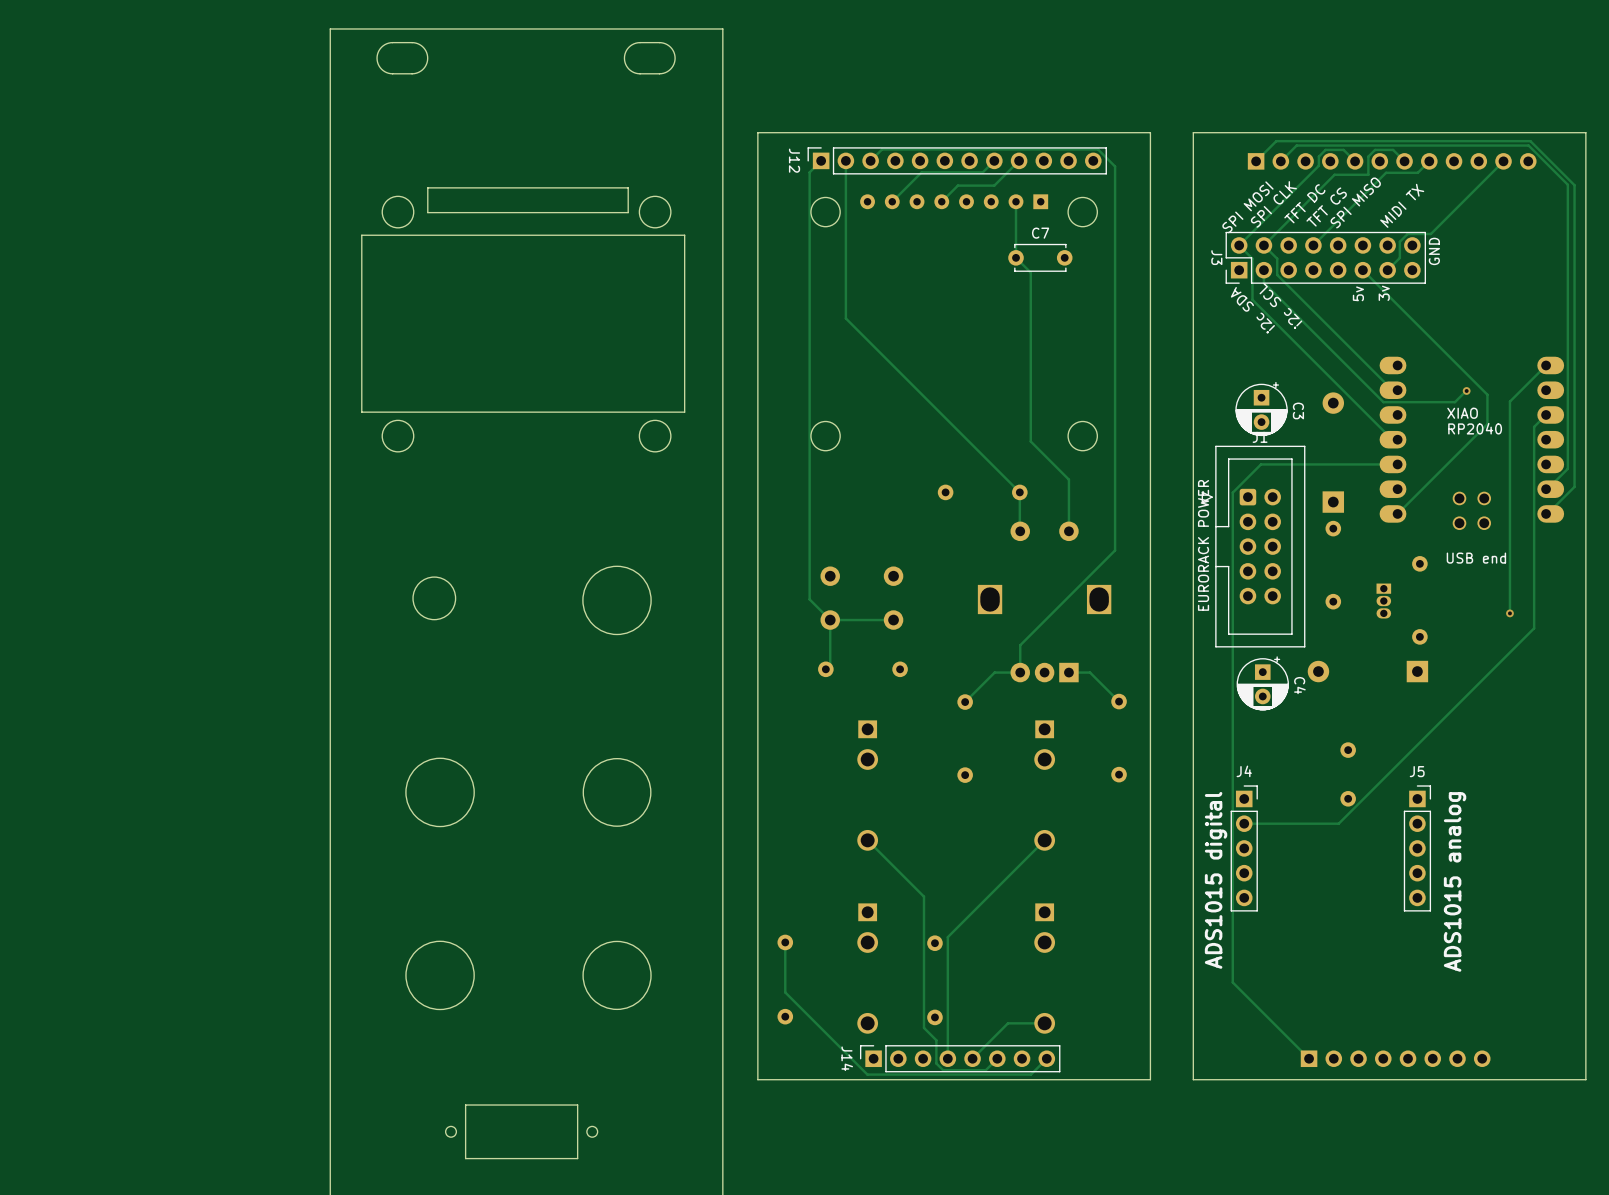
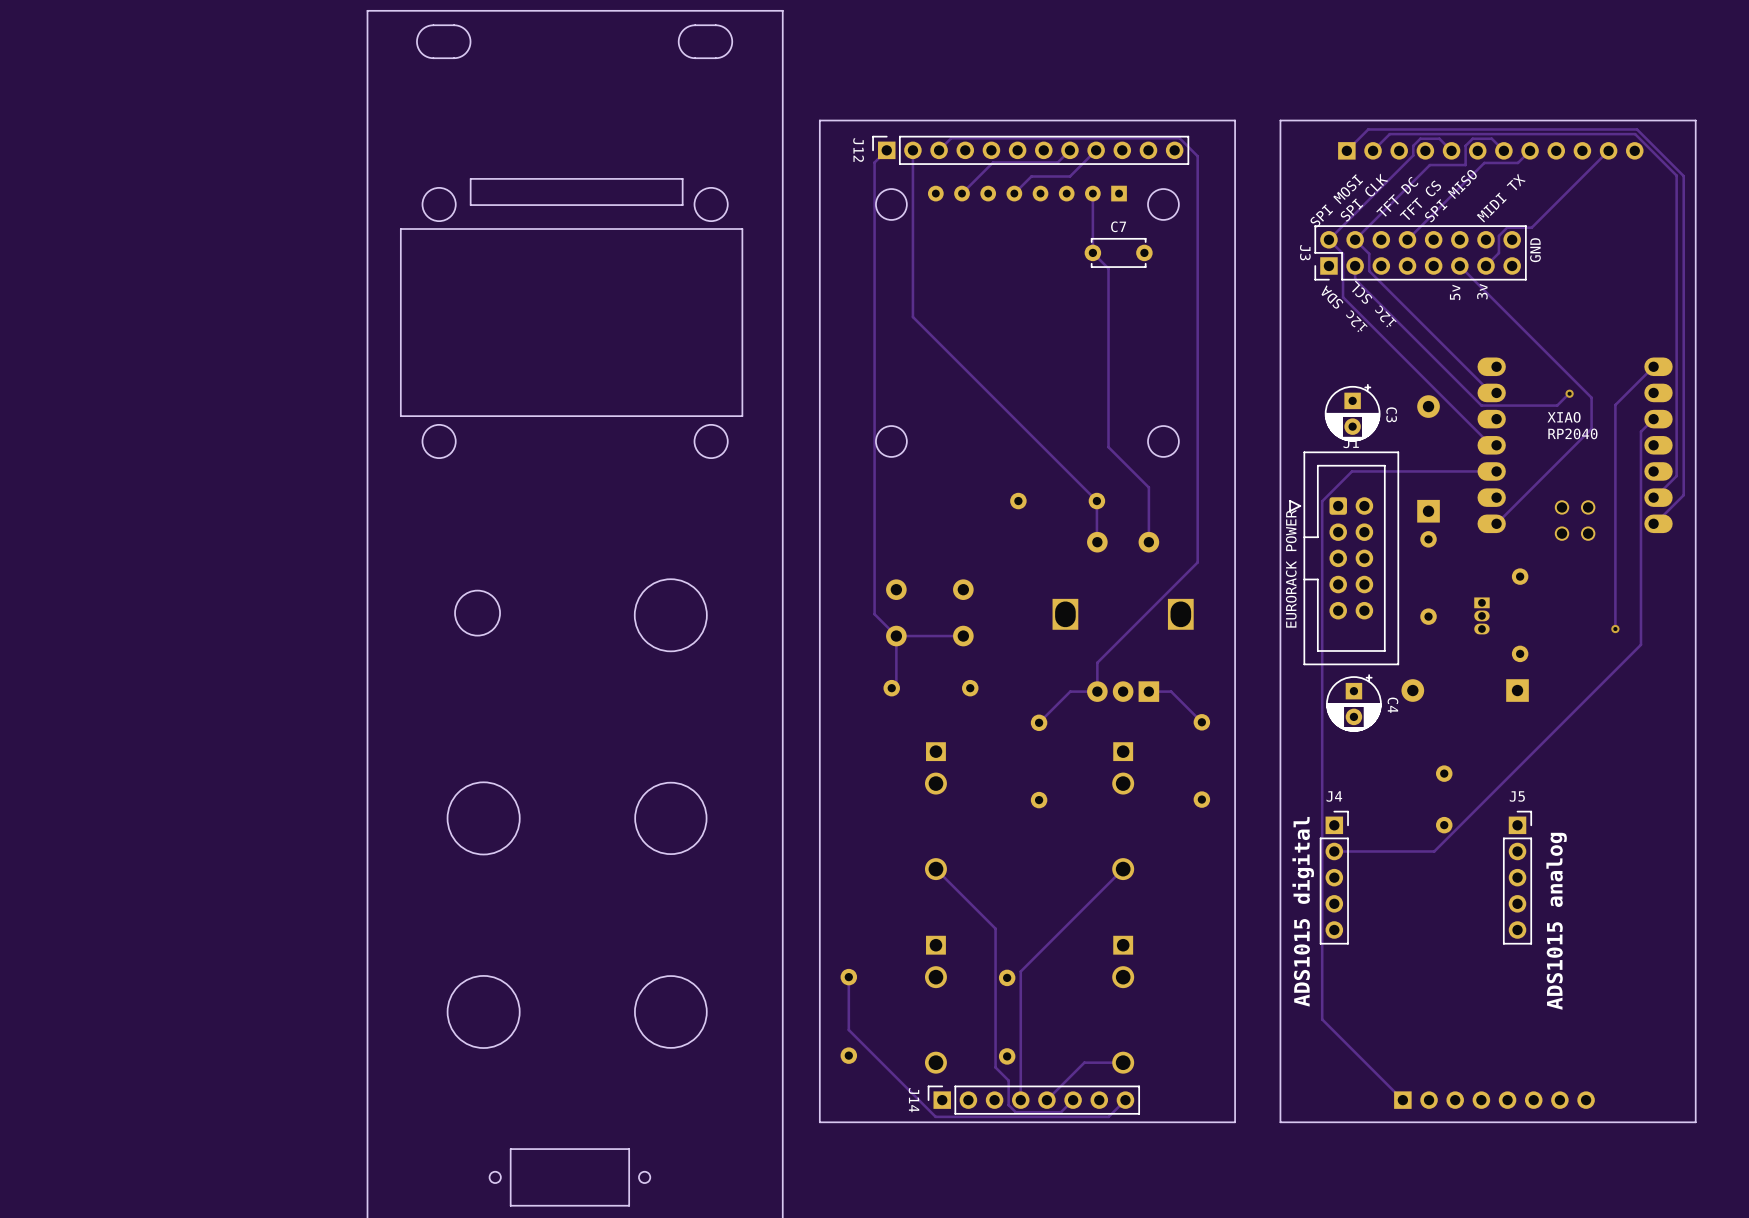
text: USB end (1476, 558) -> none

